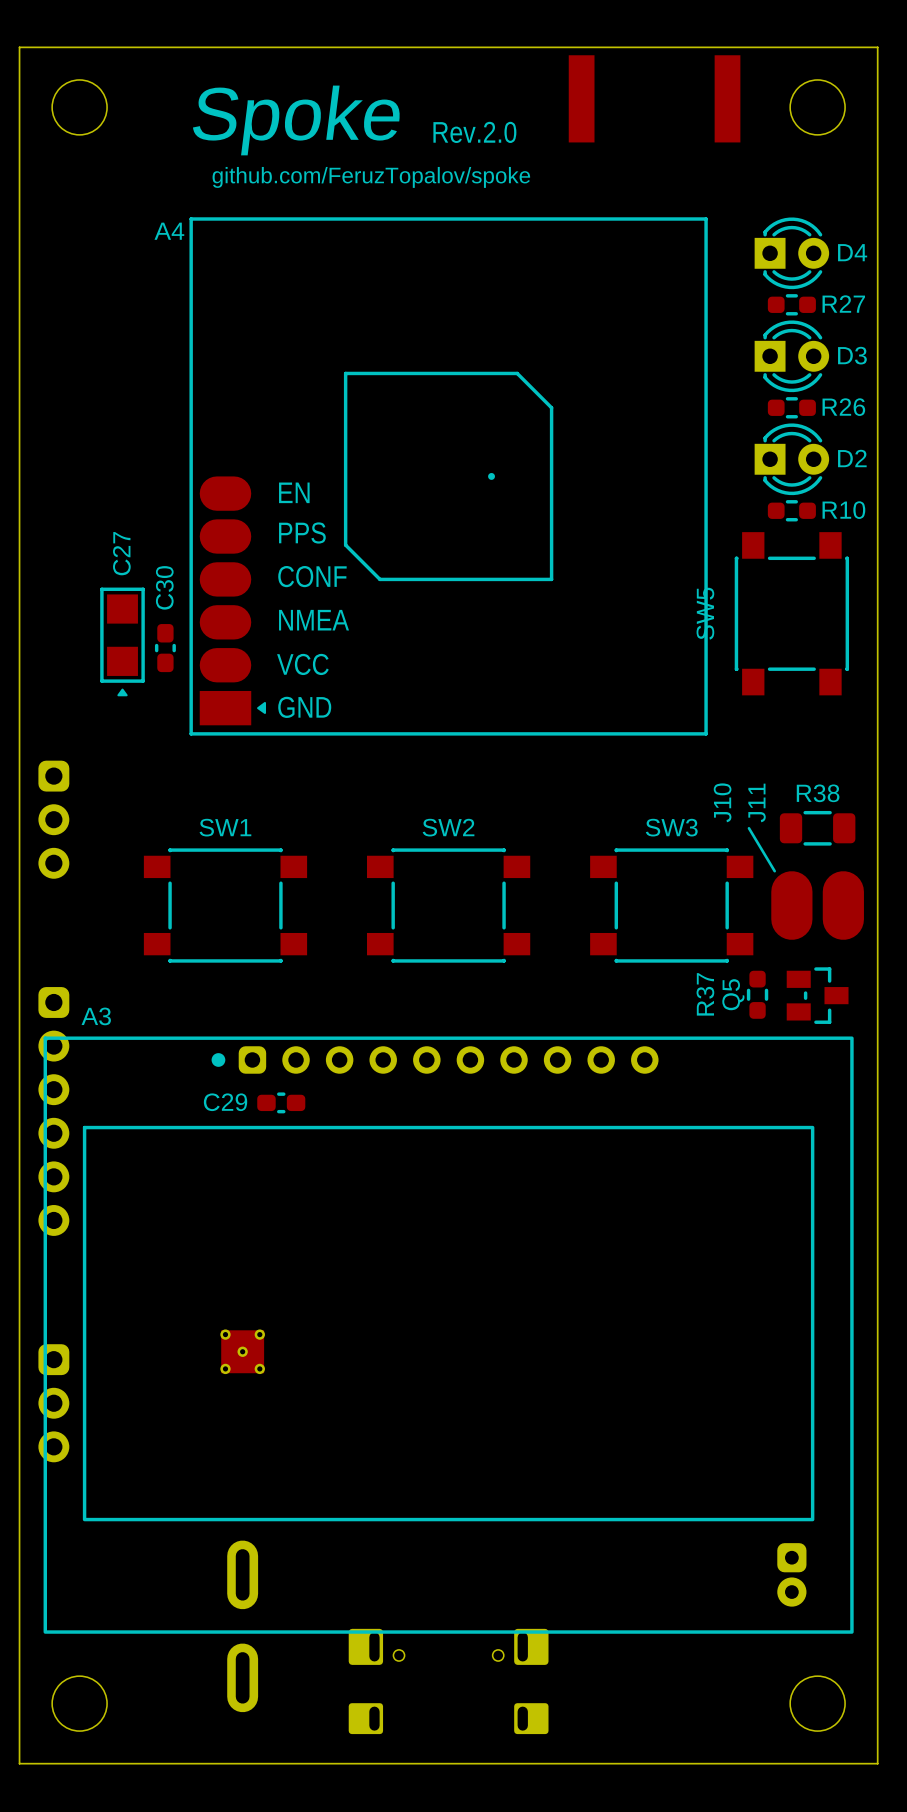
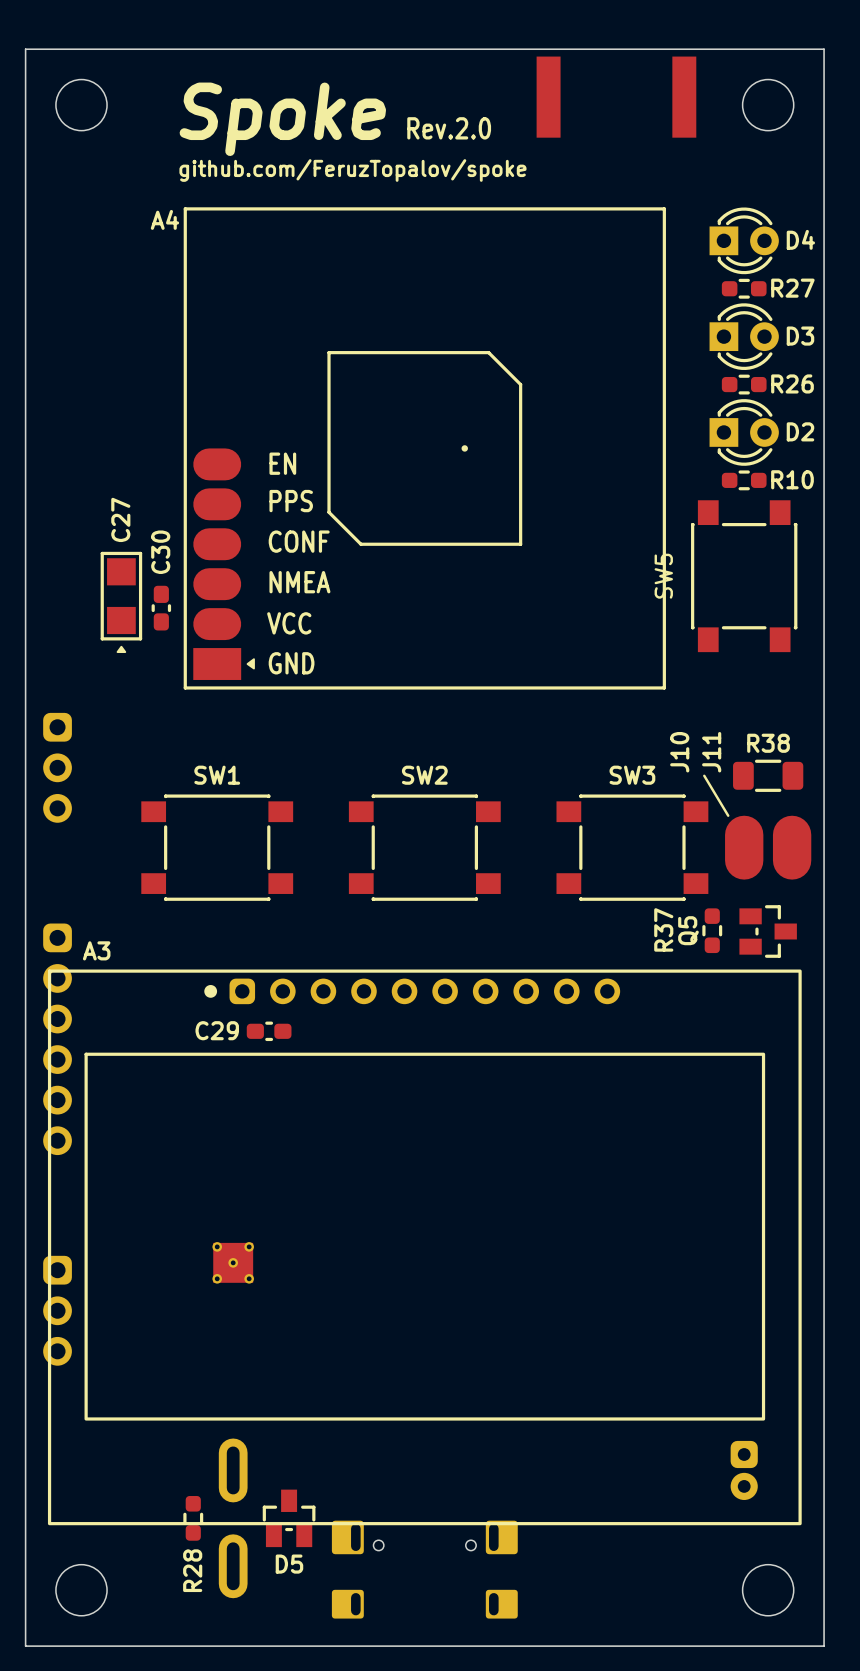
R28: none -> (193, 1518)
D5: none -> (289, 1518)

